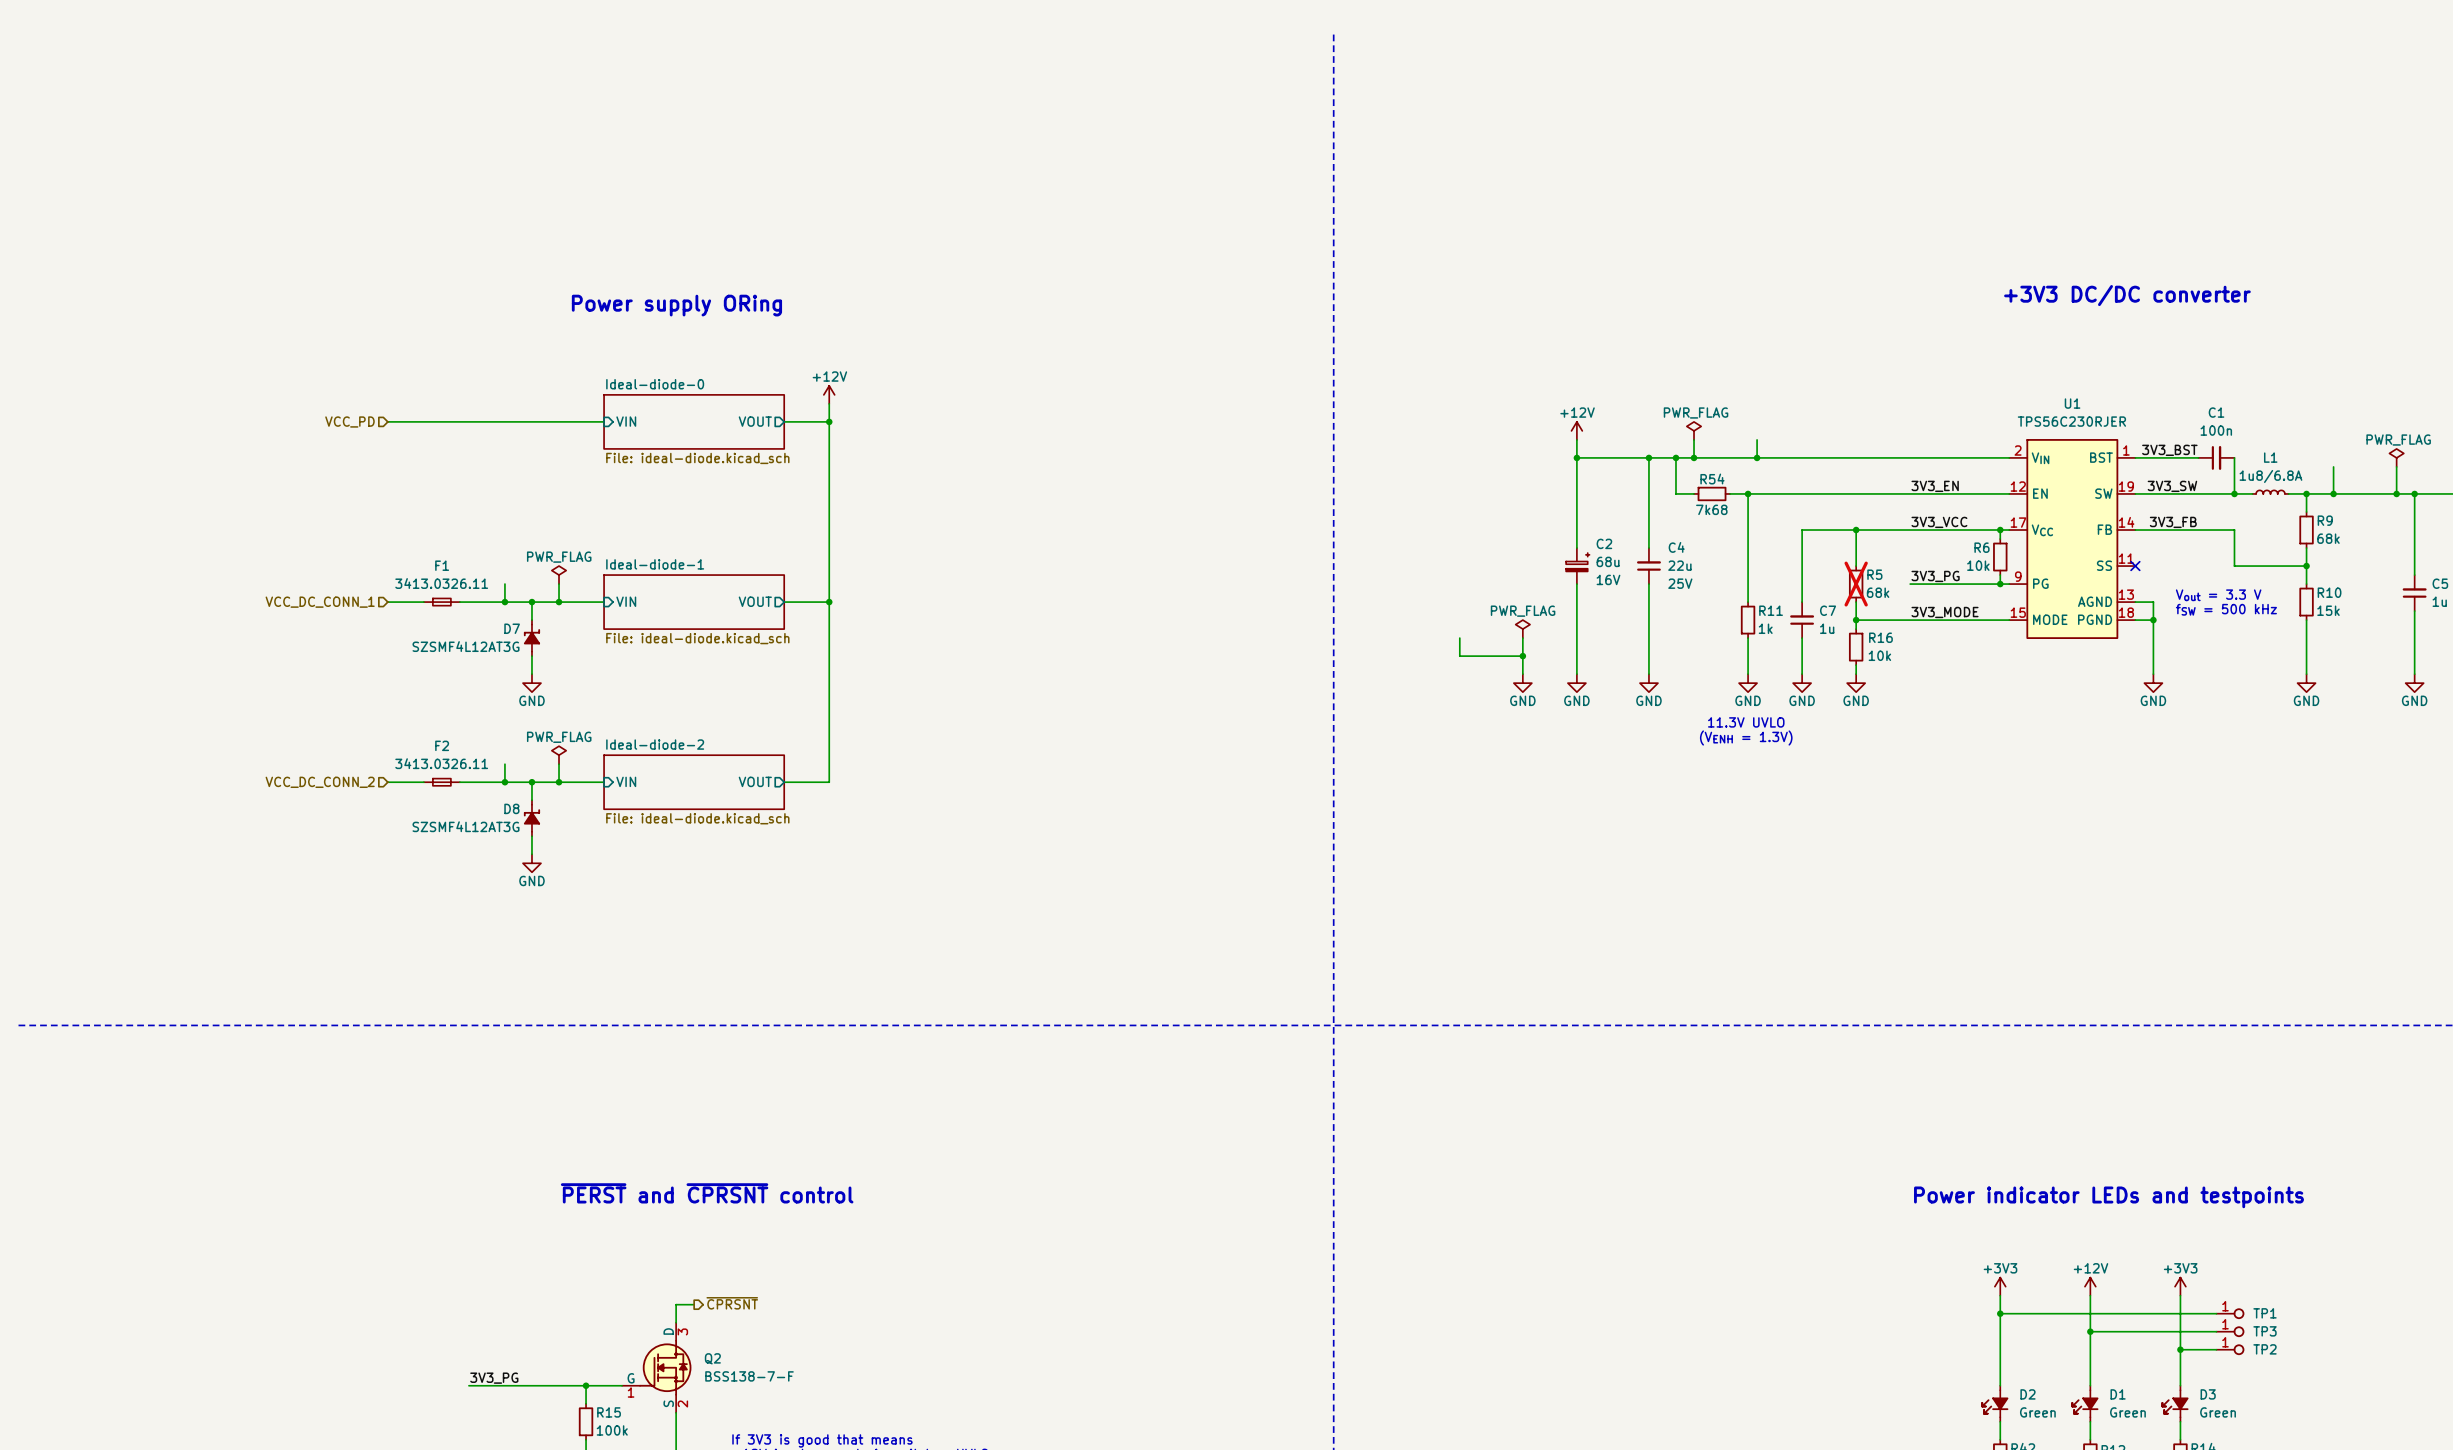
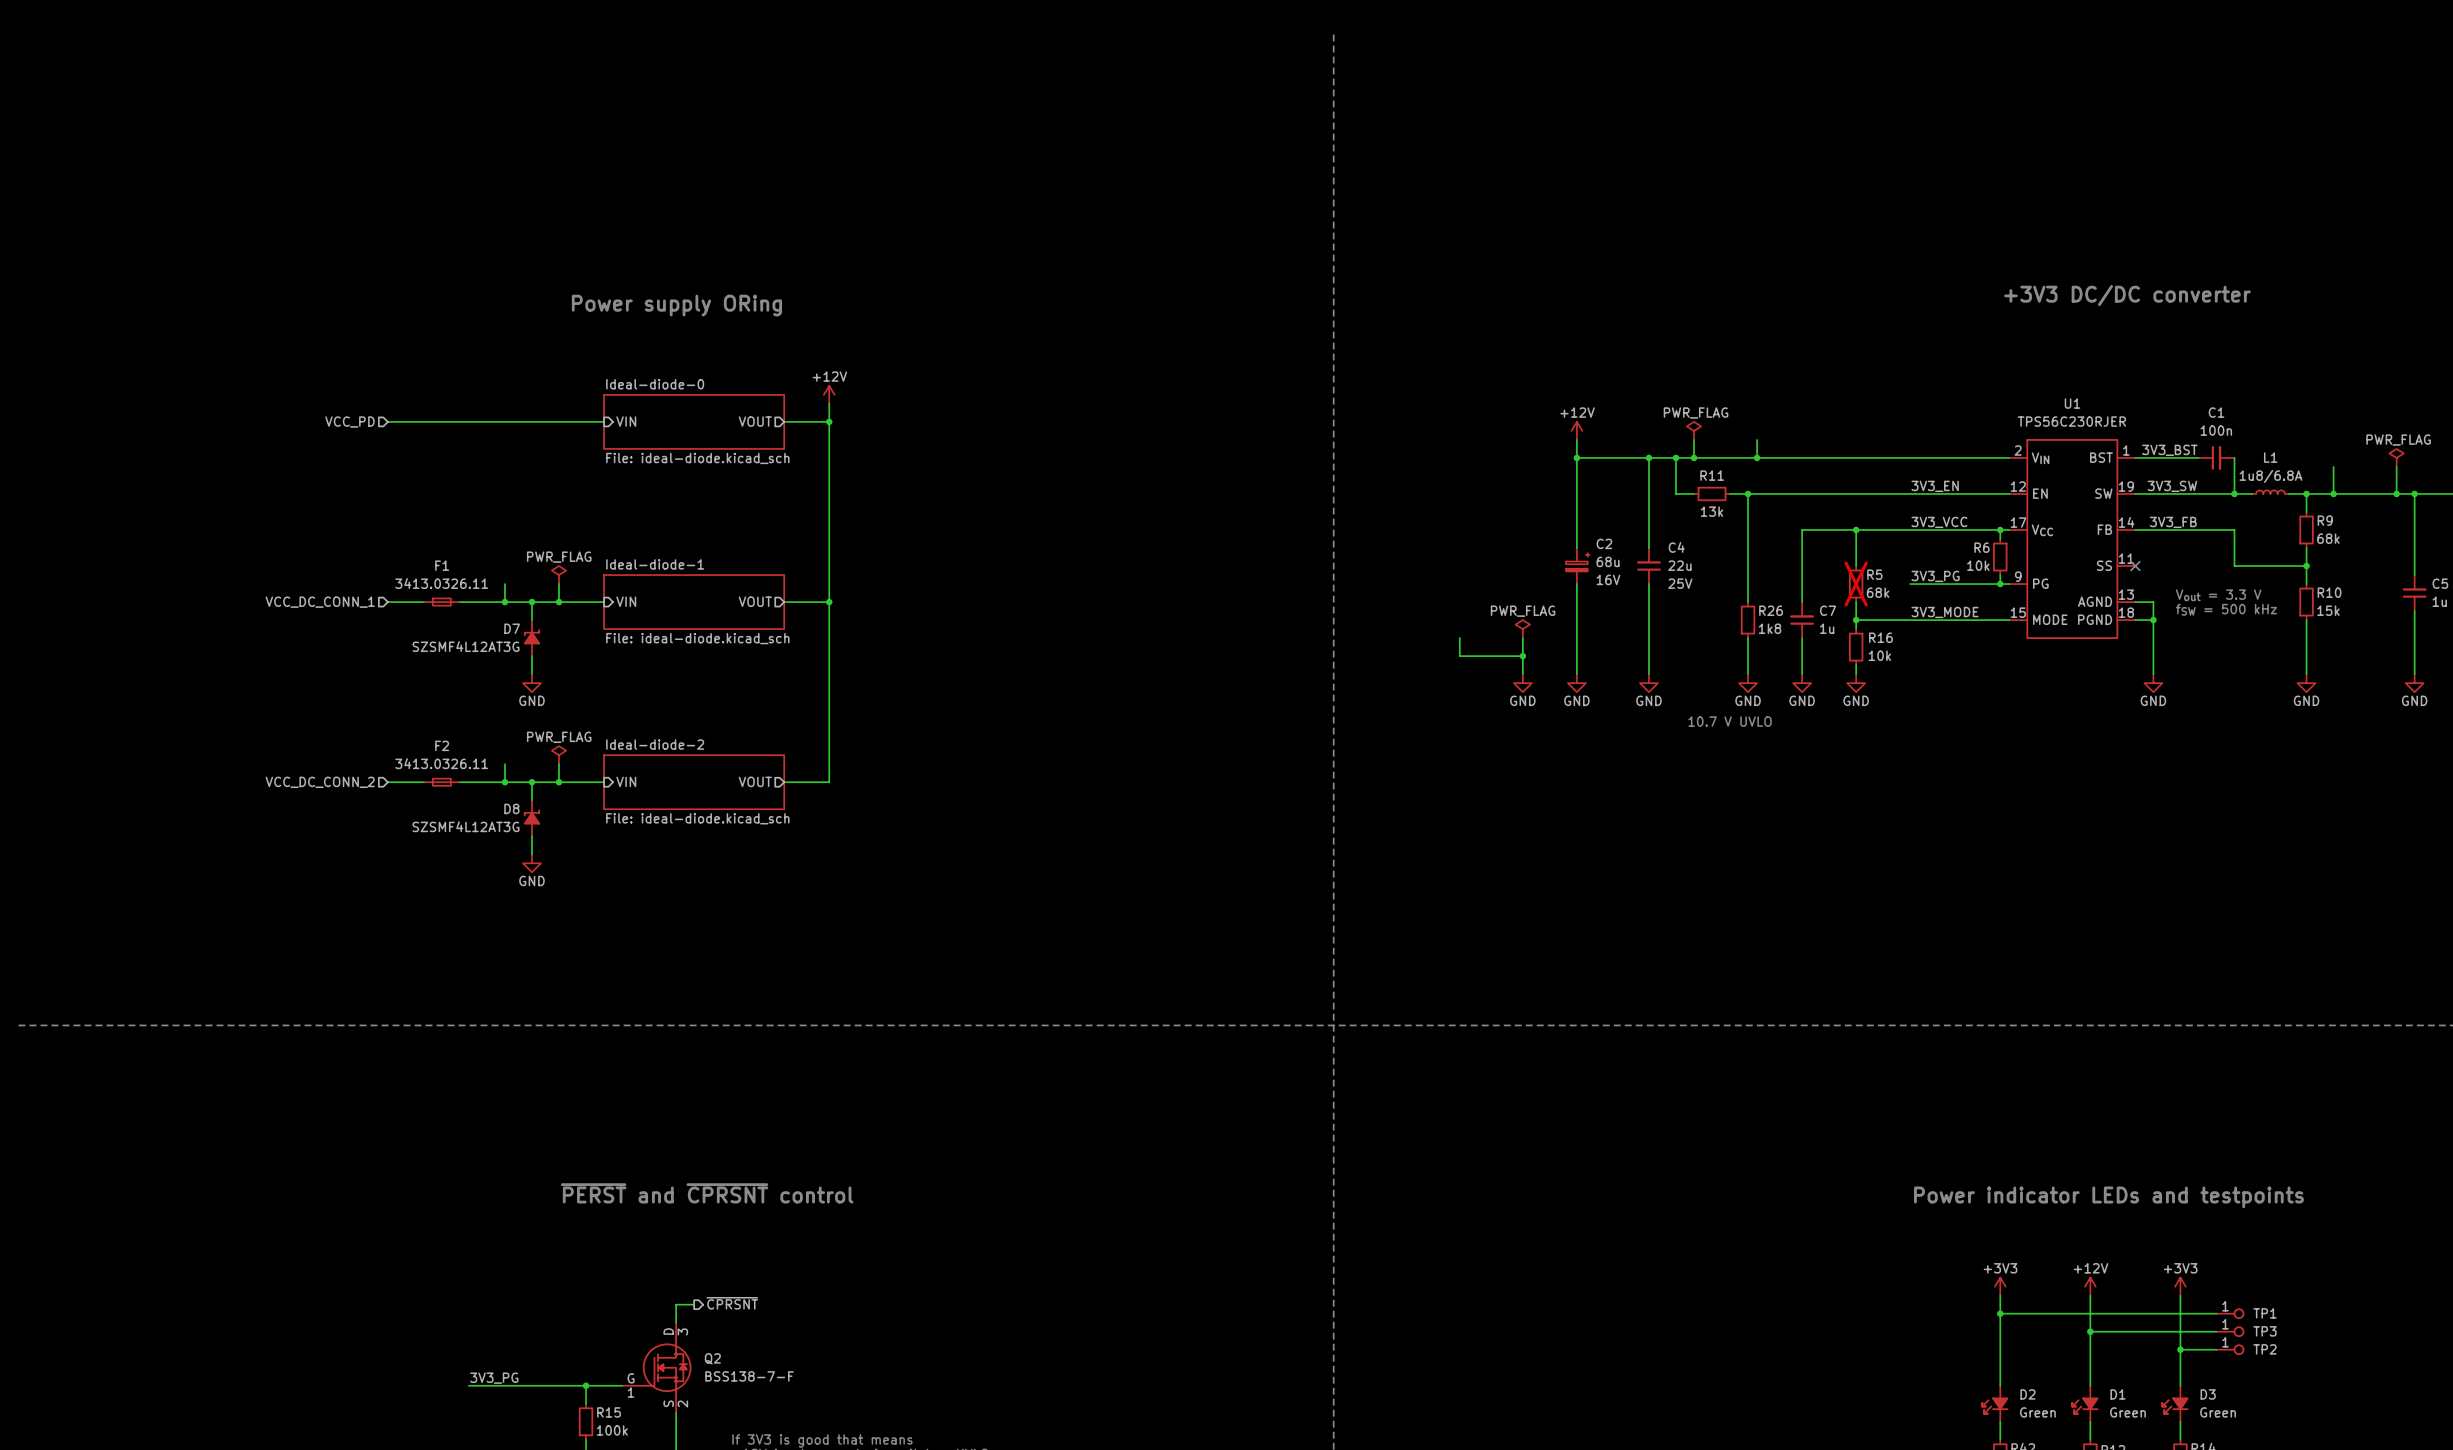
R54 name: R54 (1712, 479) -> R11 (1712, 475)
R54 text: 7k68 (1711, 509) -> 13k (1712, 511)
R11 name: R11 (1771, 610) -> R26 (1771, 610)
R11 text: 1k (1765, 628) -> 1k8 (1769, 628)
text: 11.3V UVLO (1746, 722) -> 10.7 V UVLO (1730, 721)
text: (VENH = 1.3V) (1746, 737) -> none

